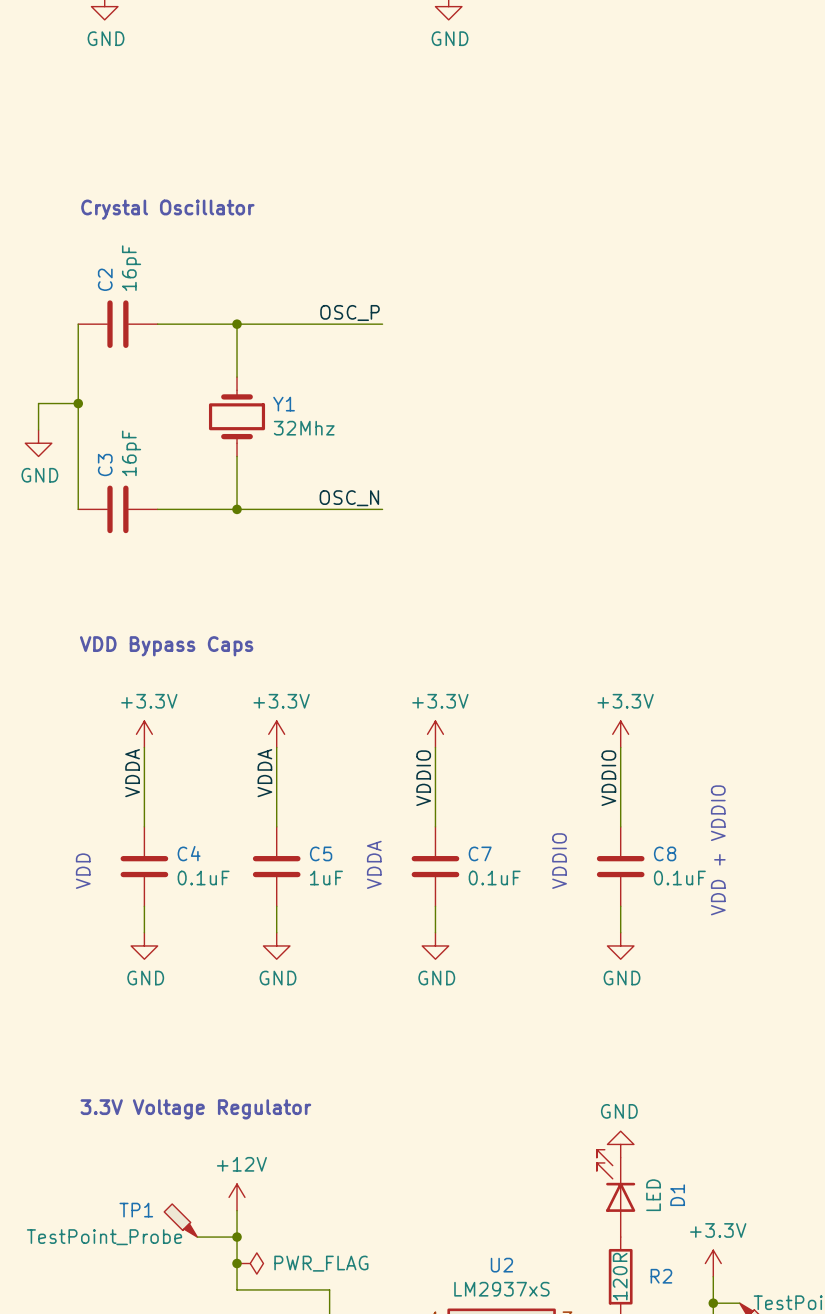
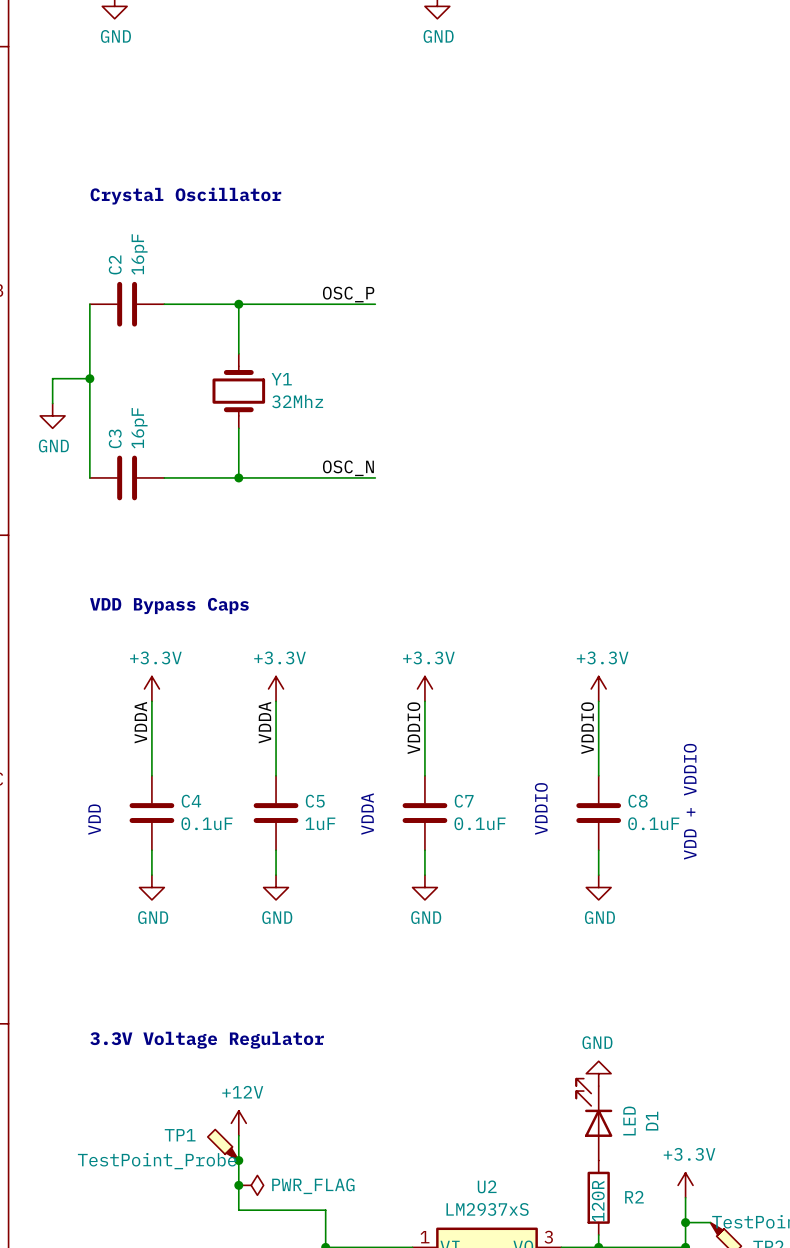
TP1 position: (180, 1220) -> (223, 1145)
wire: (197, 1237) (237, 1237) -> none

